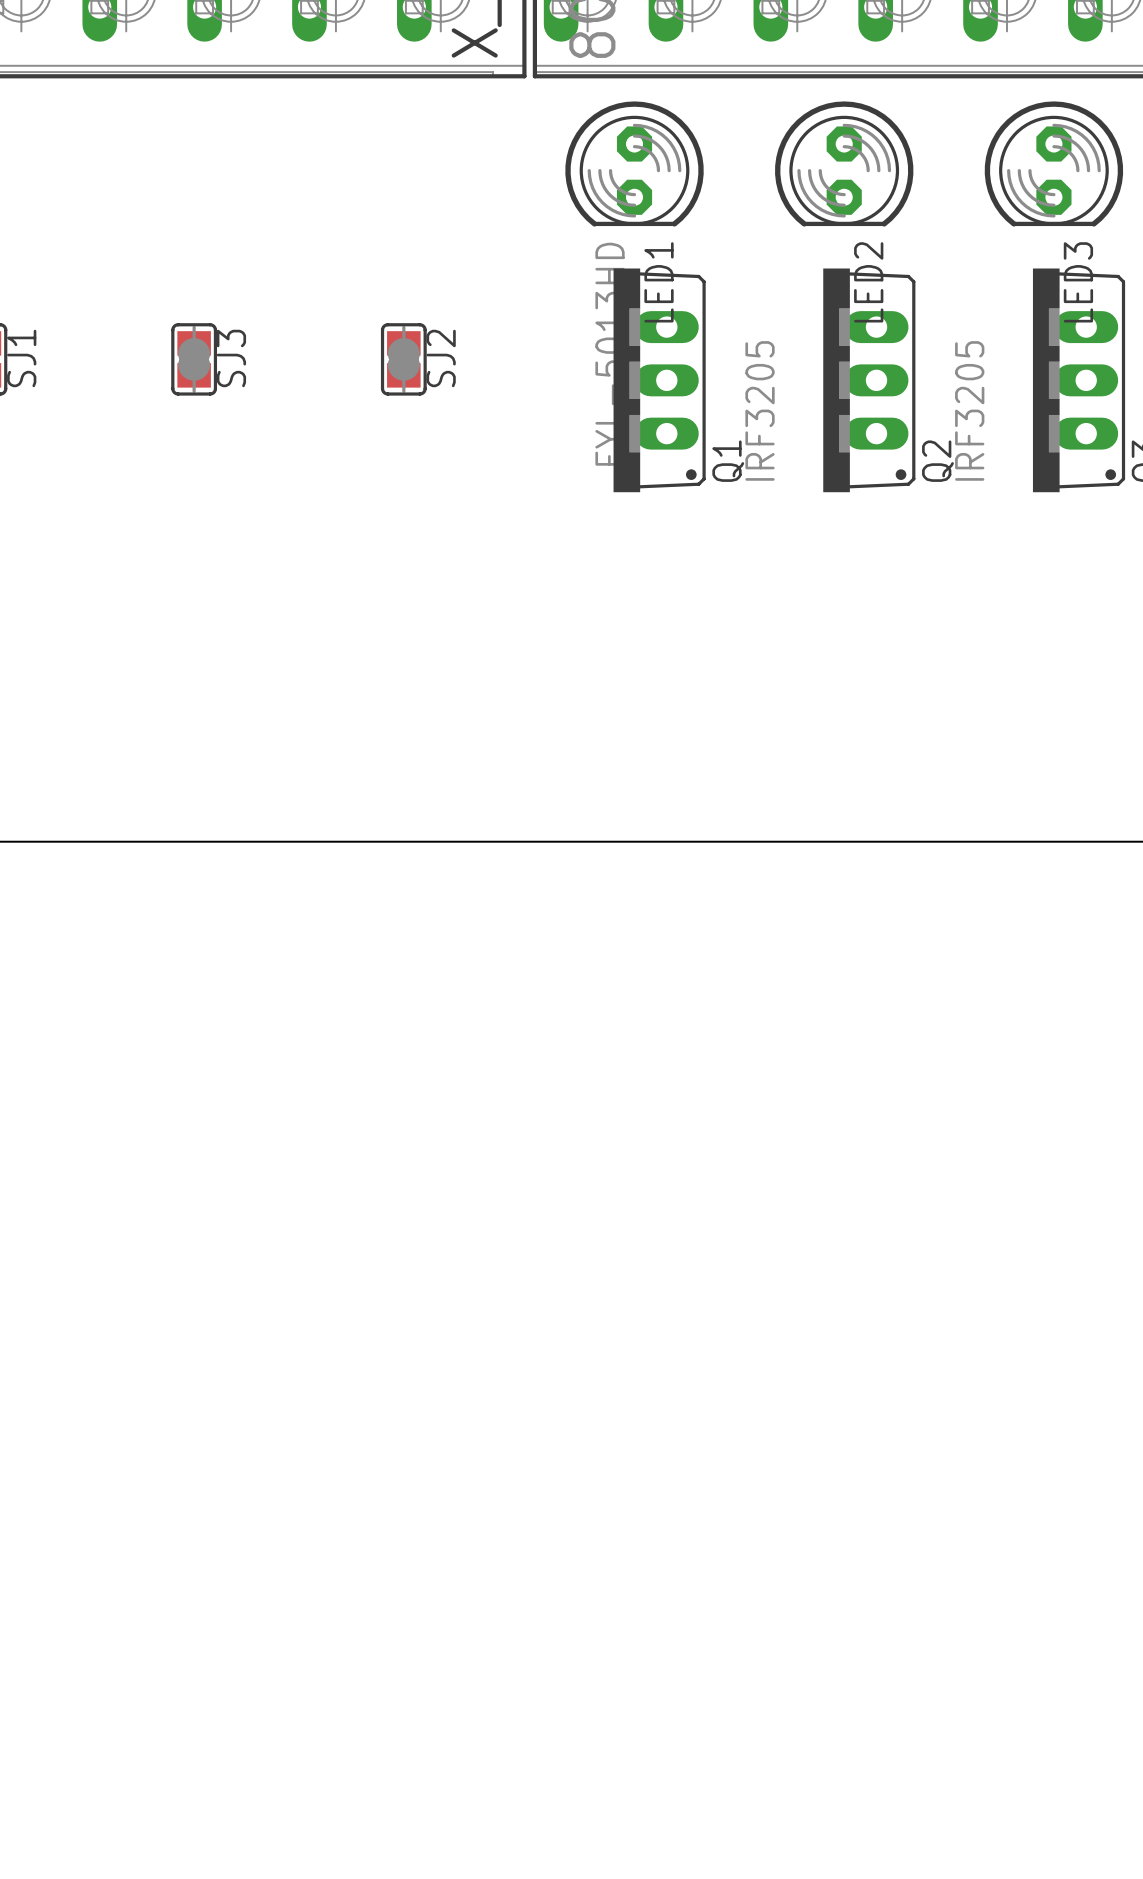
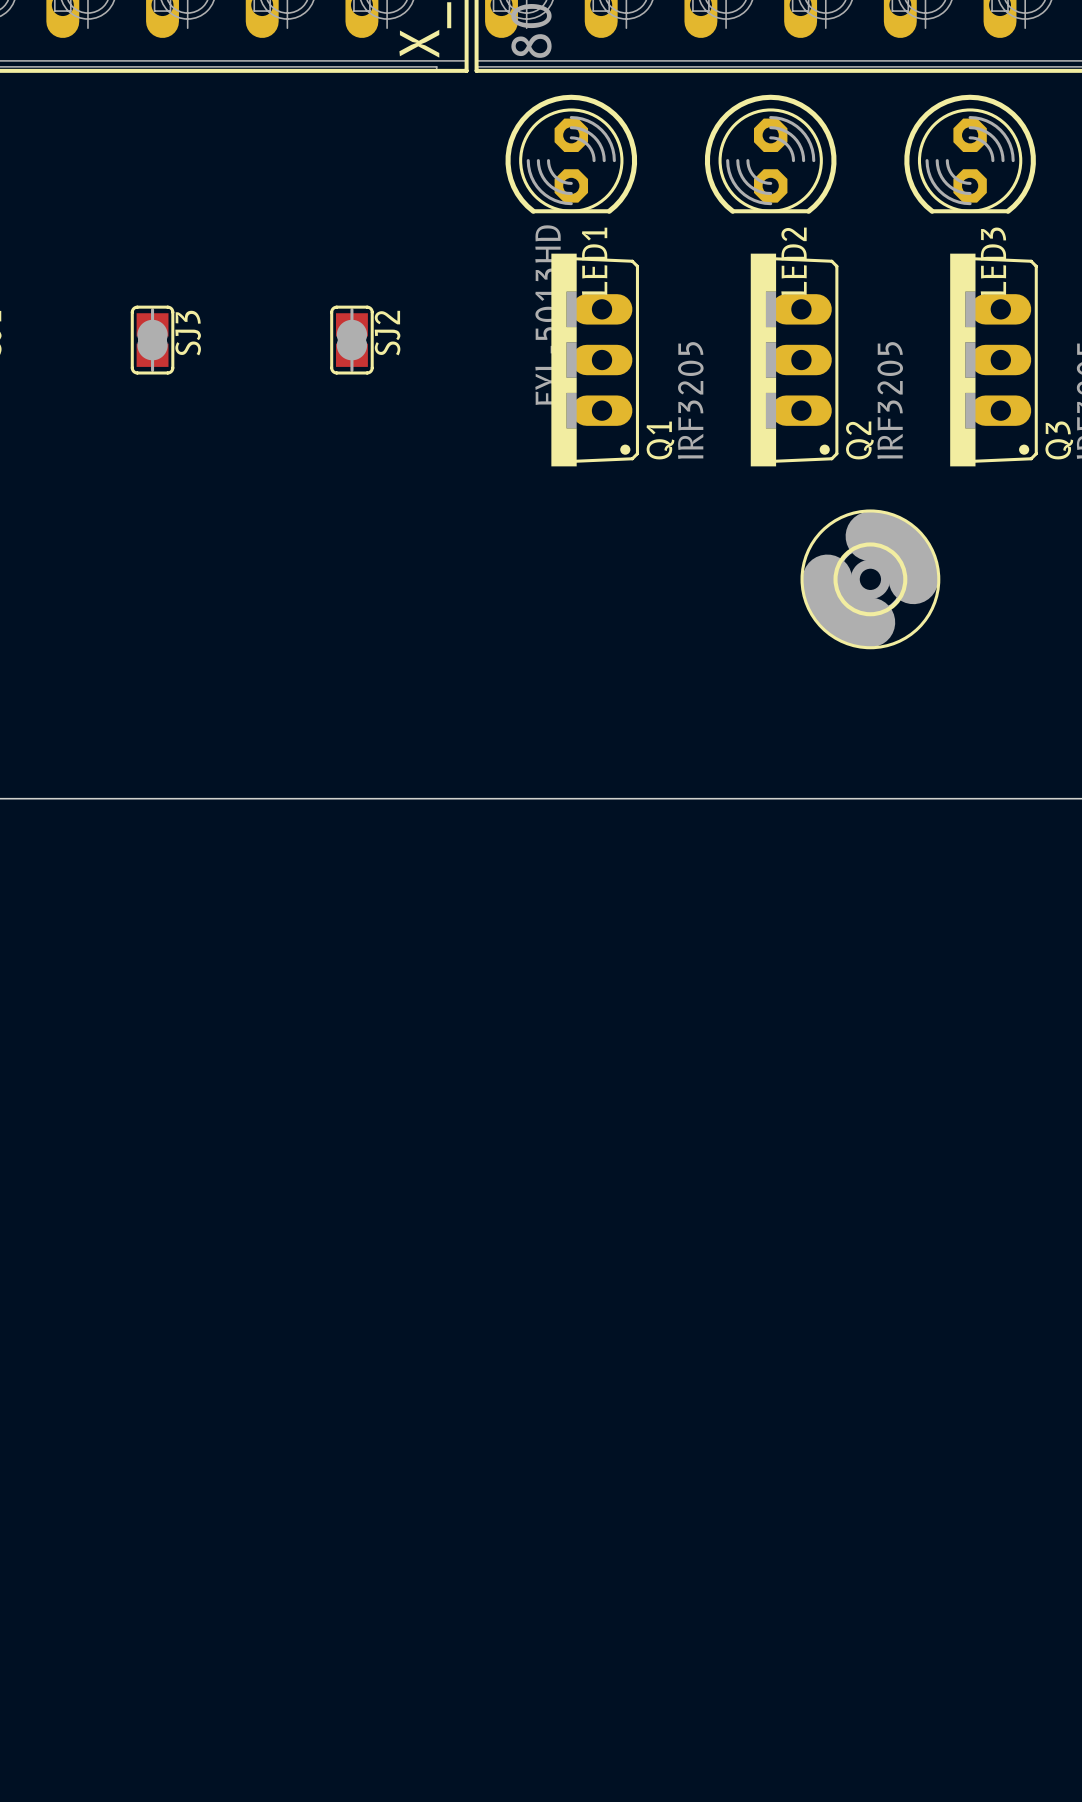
part: none -> (870, 579)

